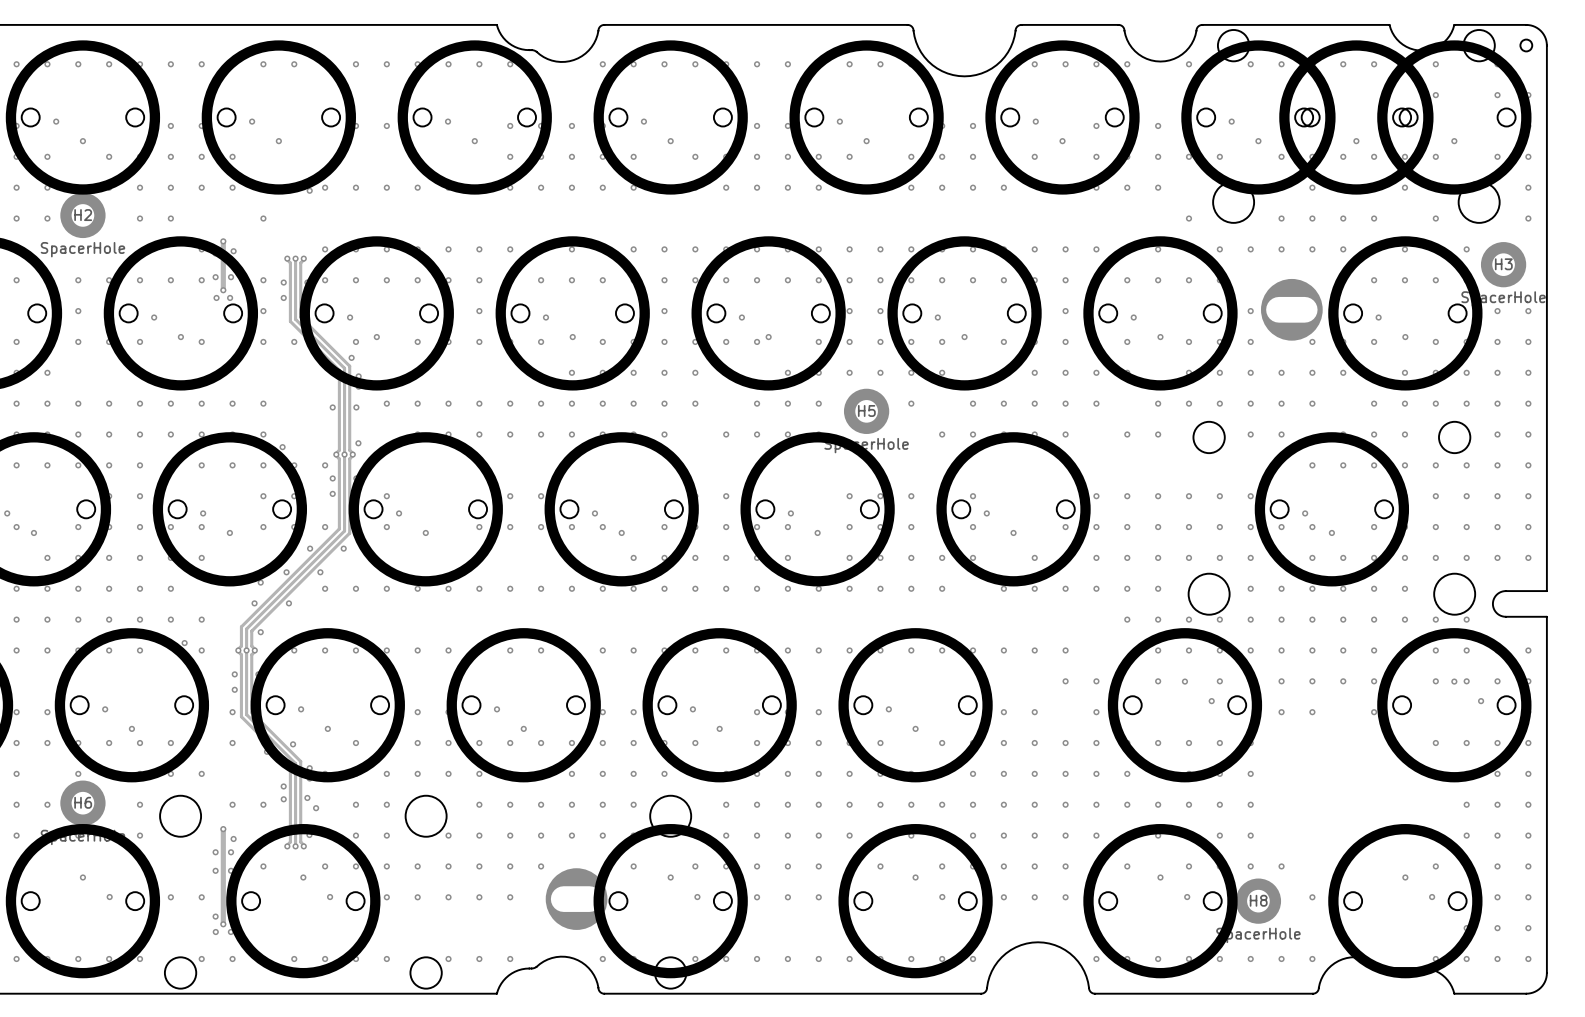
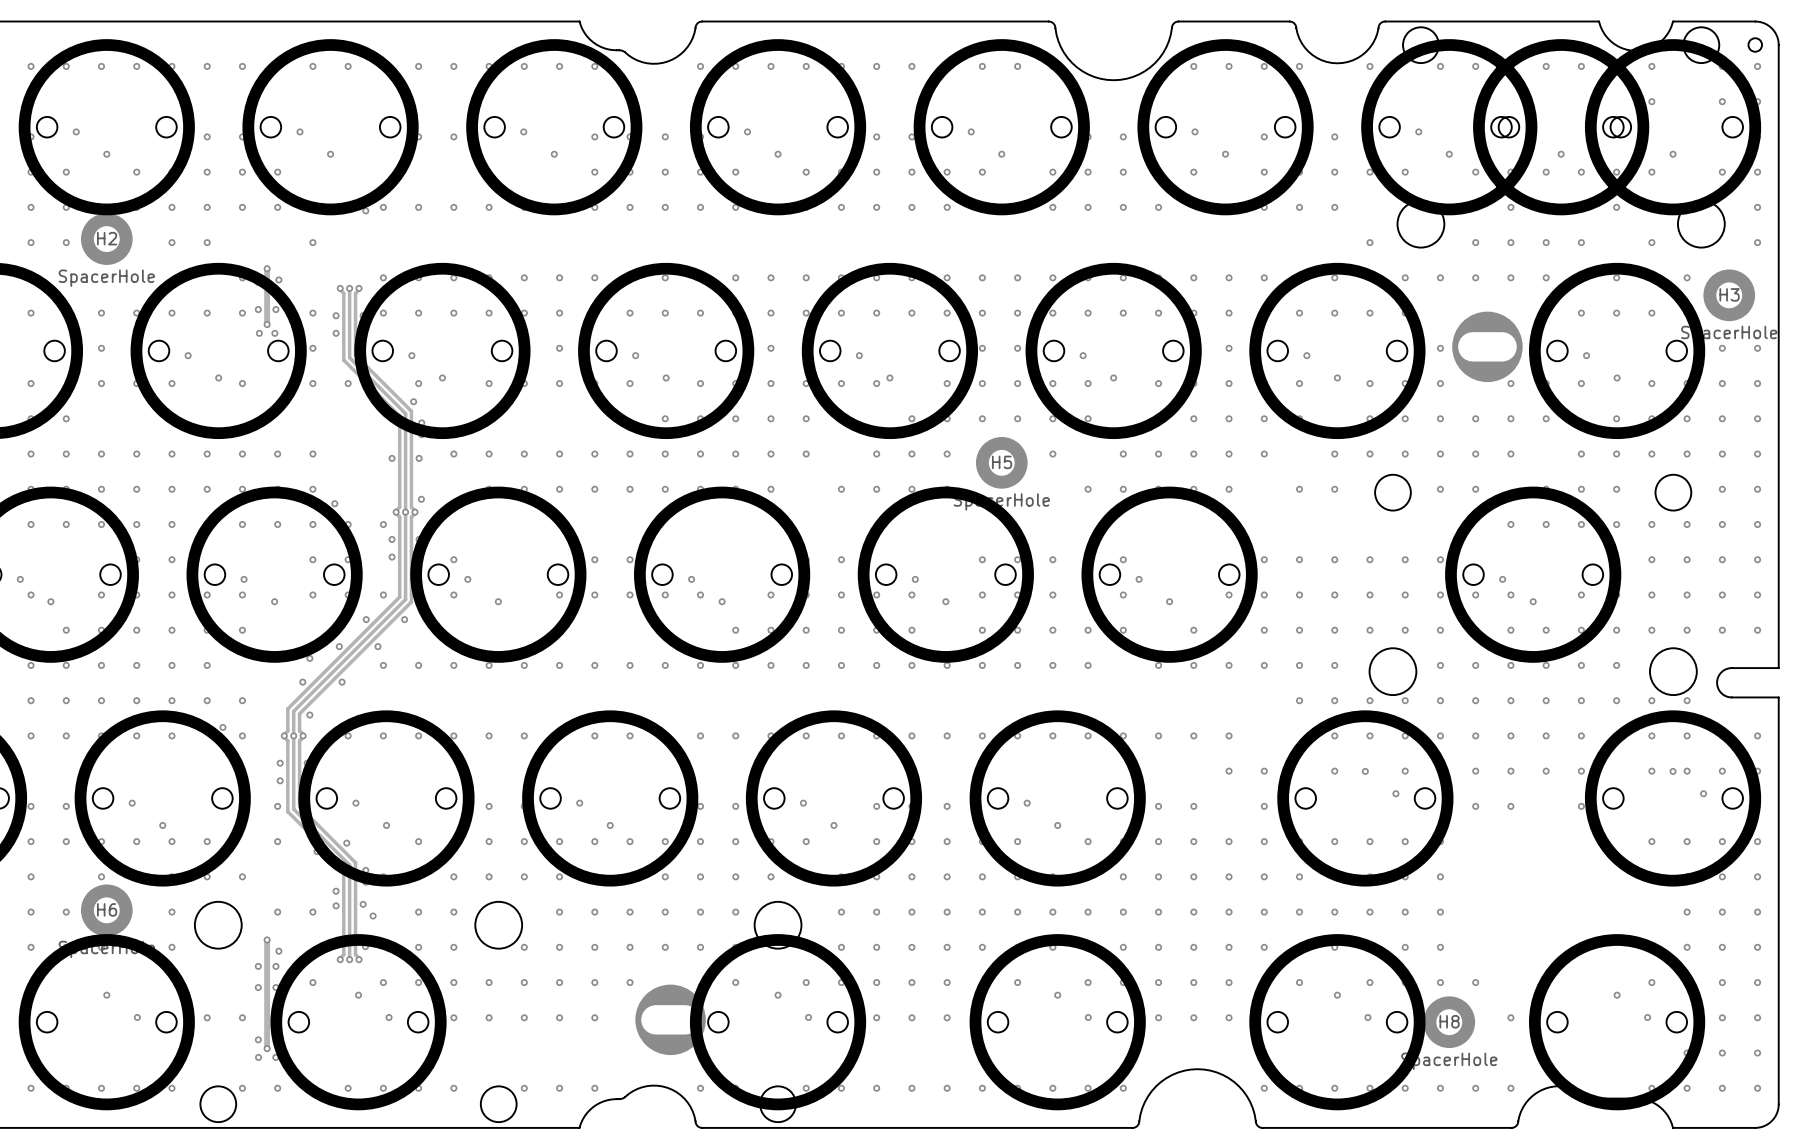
via: none -> (1757, 66)

